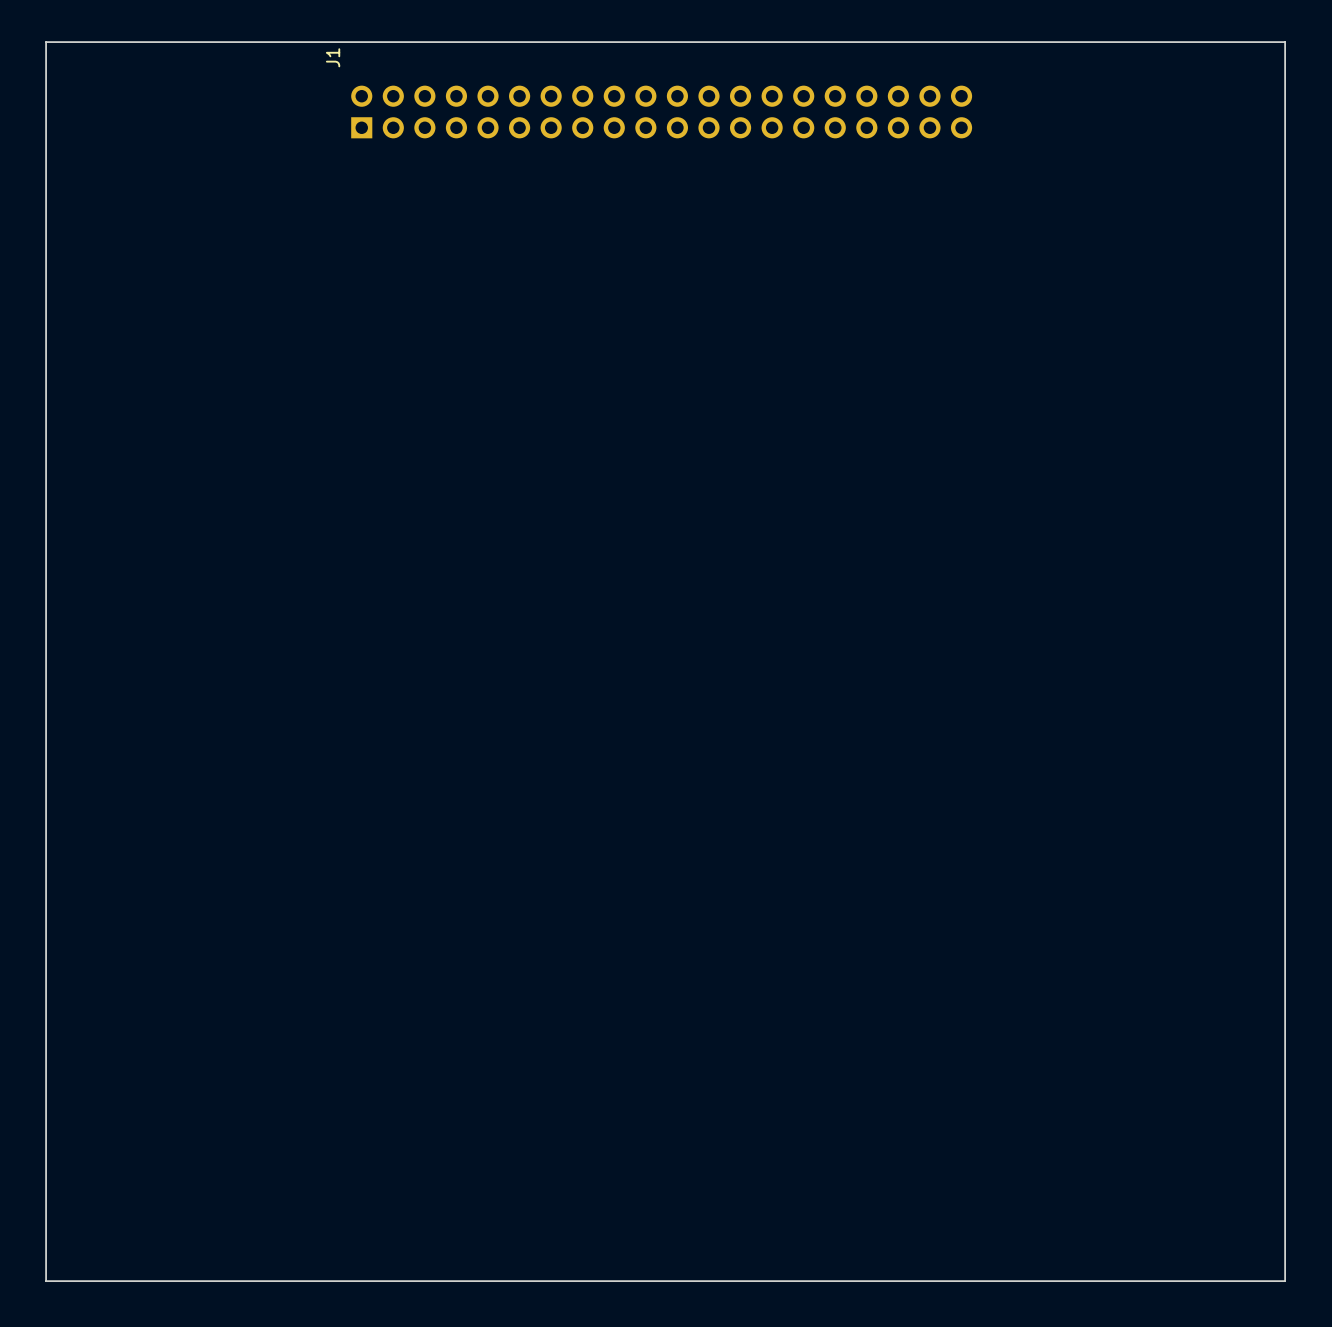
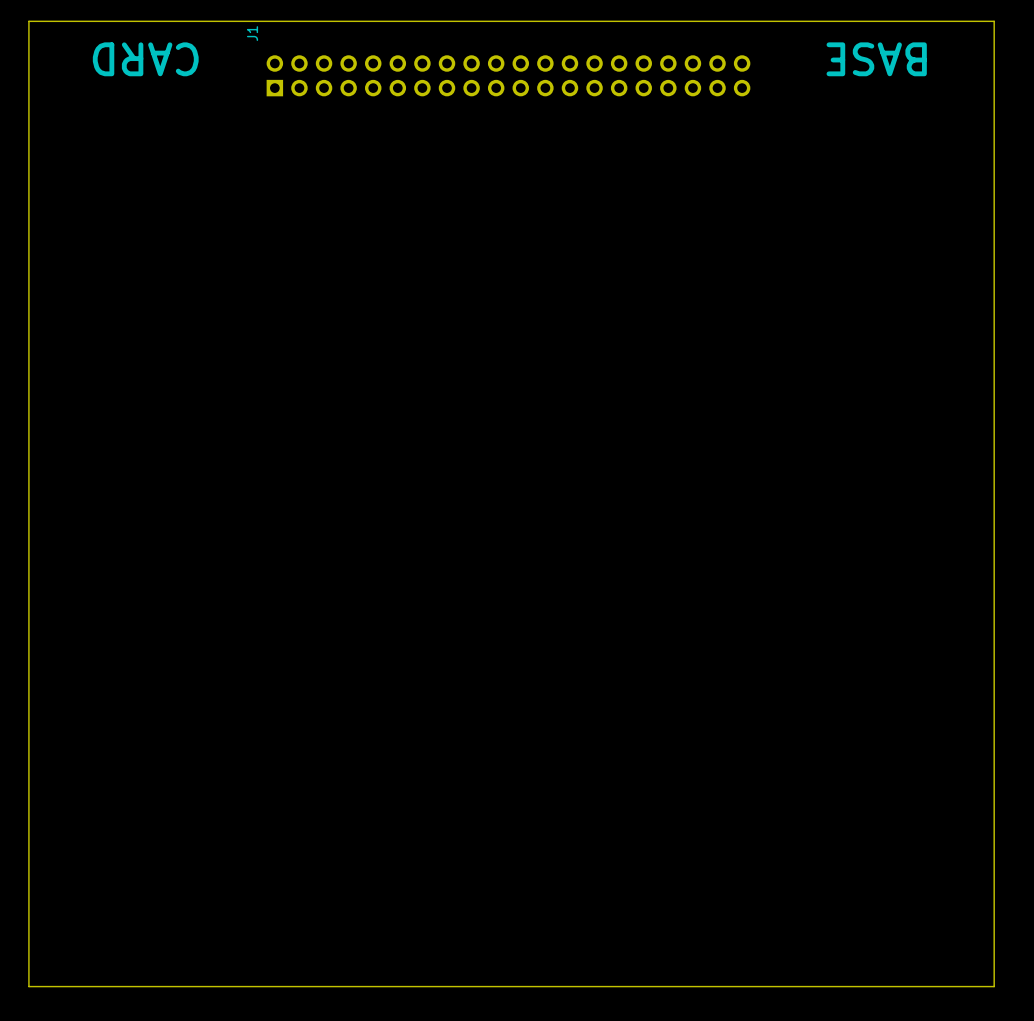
text: none -> CARD (145, 59)
text: none -> BASE (876, 59)

